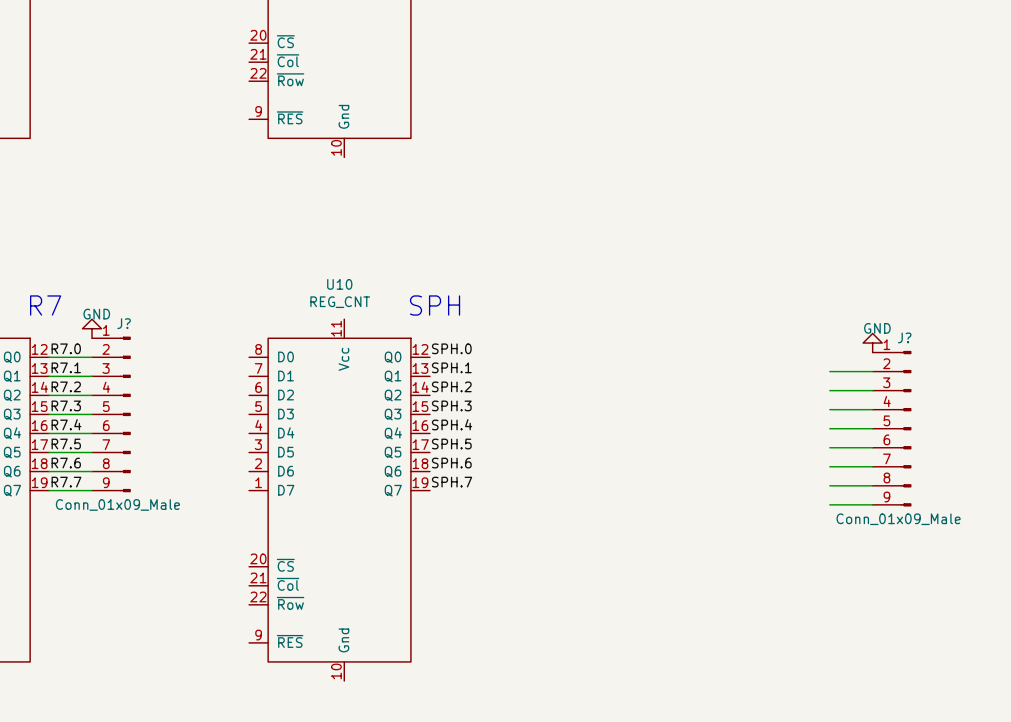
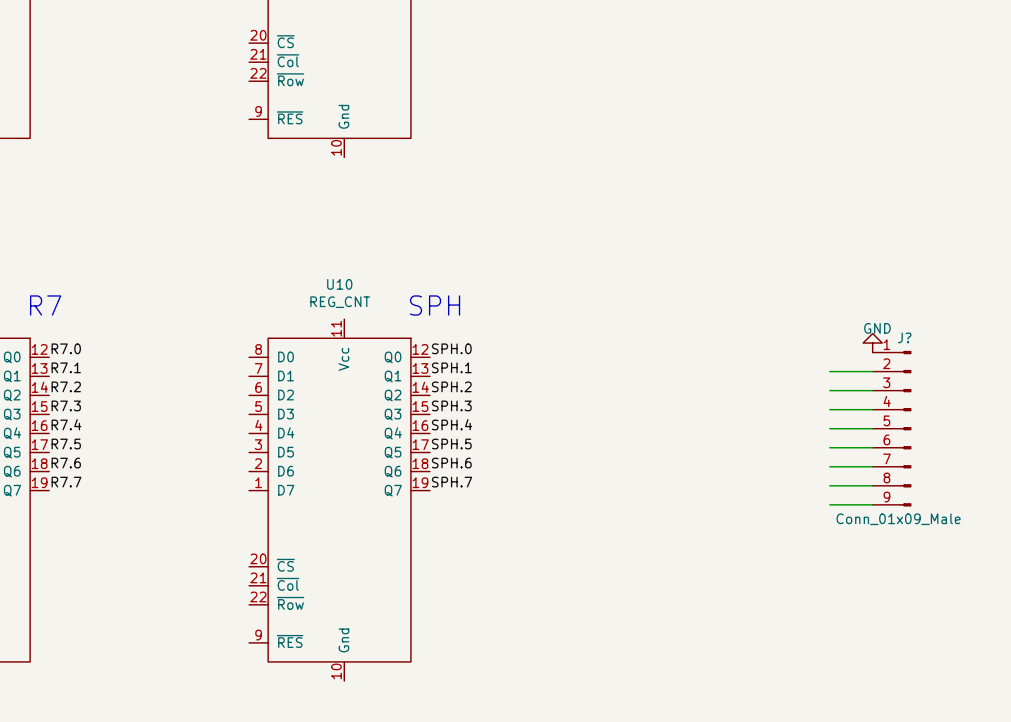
power symbol: GND (92, 328) -> none
wire: (49, 357) (92, 357) -> none
wire: (49, 376) (92, 376) -> none
wire: (49, 395) (92, 395) -> none
wire: (49, 414) (92, 414) -> none
J?: Conn_01x09_Male (111, 414) -> none
wire: (49, 433) (92, 433) -> none
wire: (49, 452) (92, 452) -> none
wire: (49, 471) (92, 471) -> none
wire: (49, 490) (92, 490) -> none

